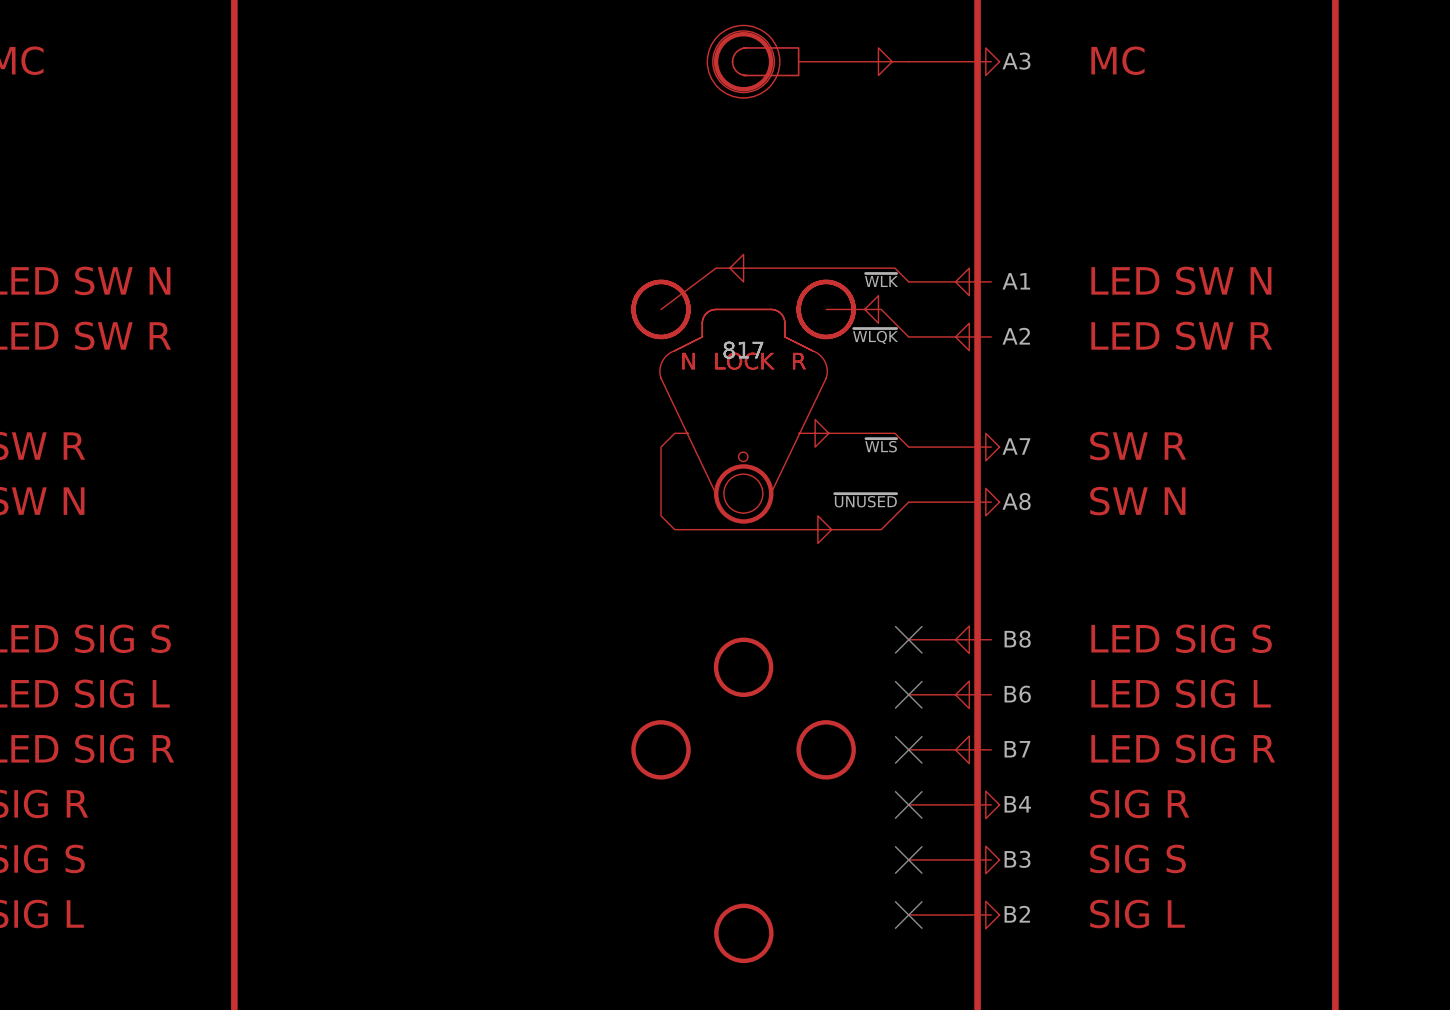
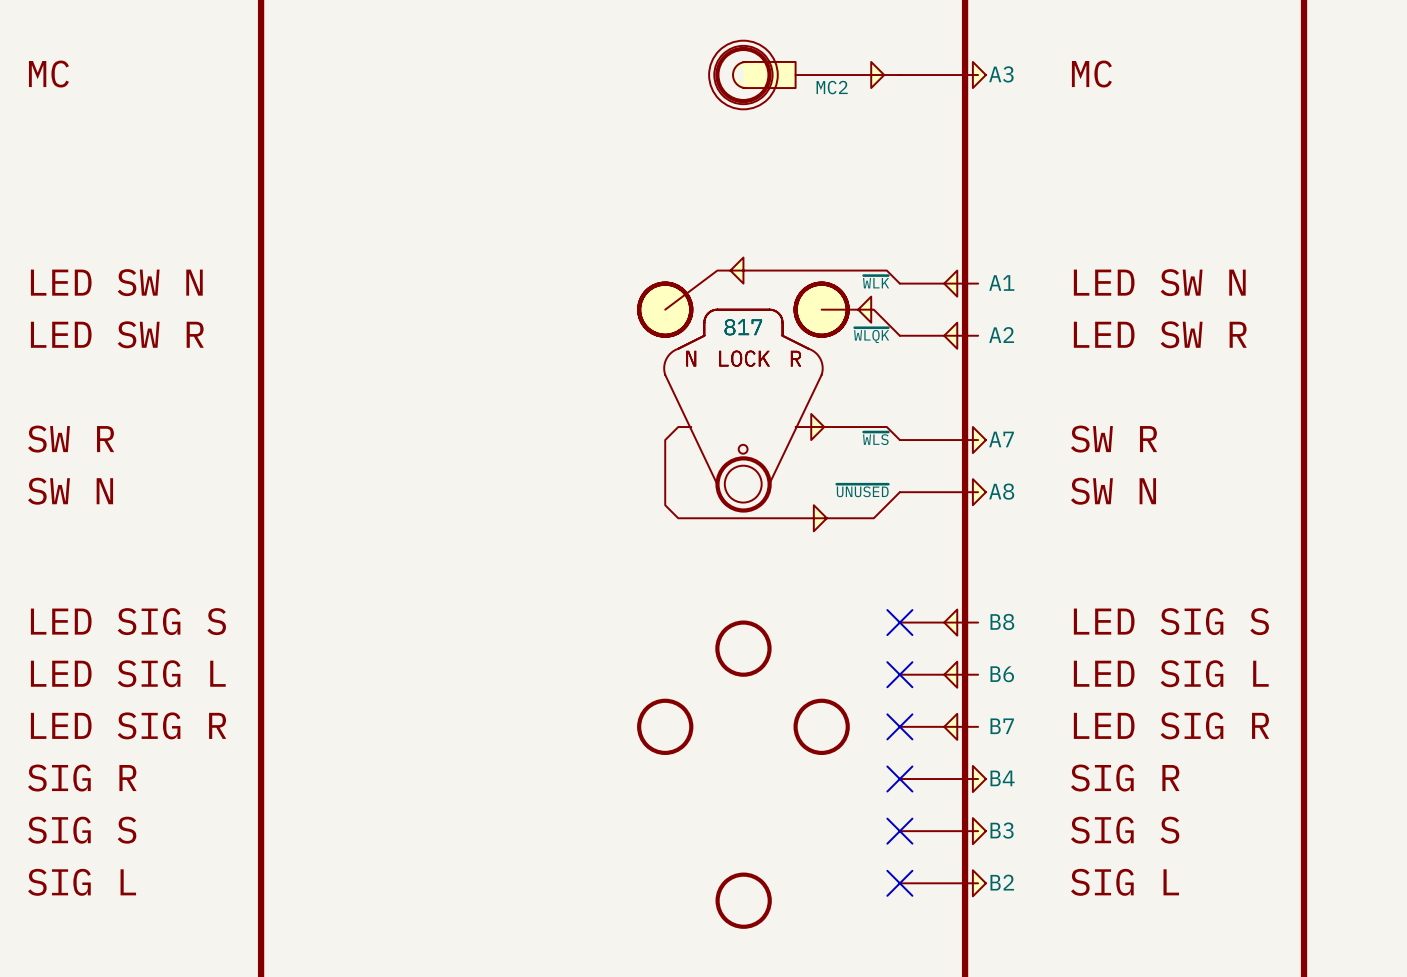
part value: none -> MC2 (832, 87)
part value position: 817 (743, 350) -> 817 (743, 327)
part value position: 817 (743, 350) -> 817 (743, 327)

